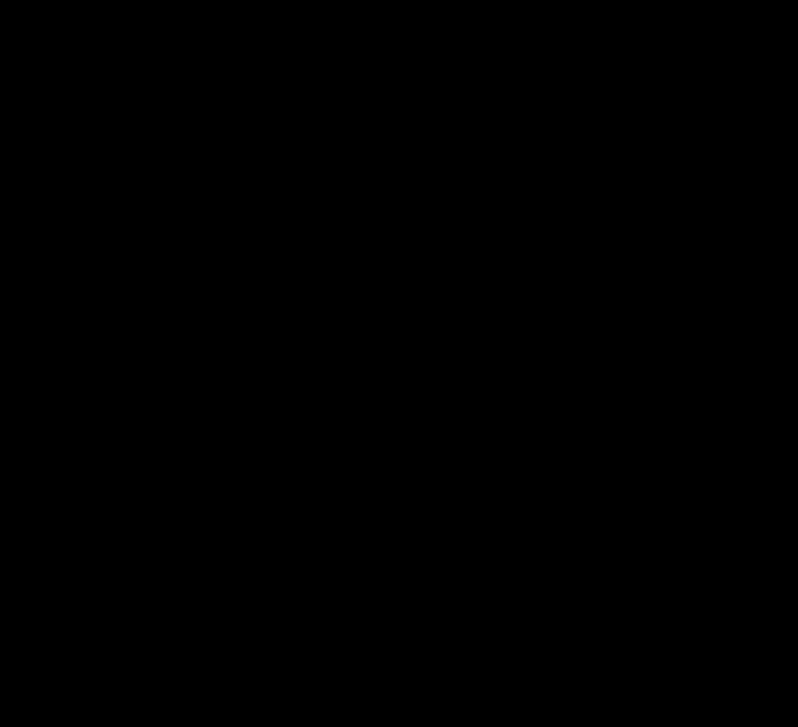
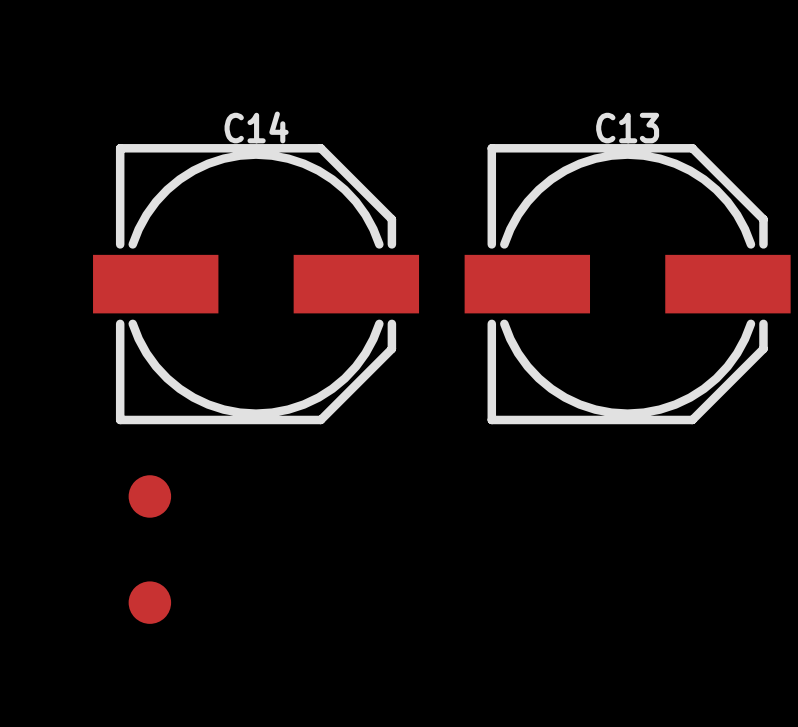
C14: none -> (256, 284)
C13: none -> (627, 284)
part: none -> (149, 496)
part: none -> (149, 602)

